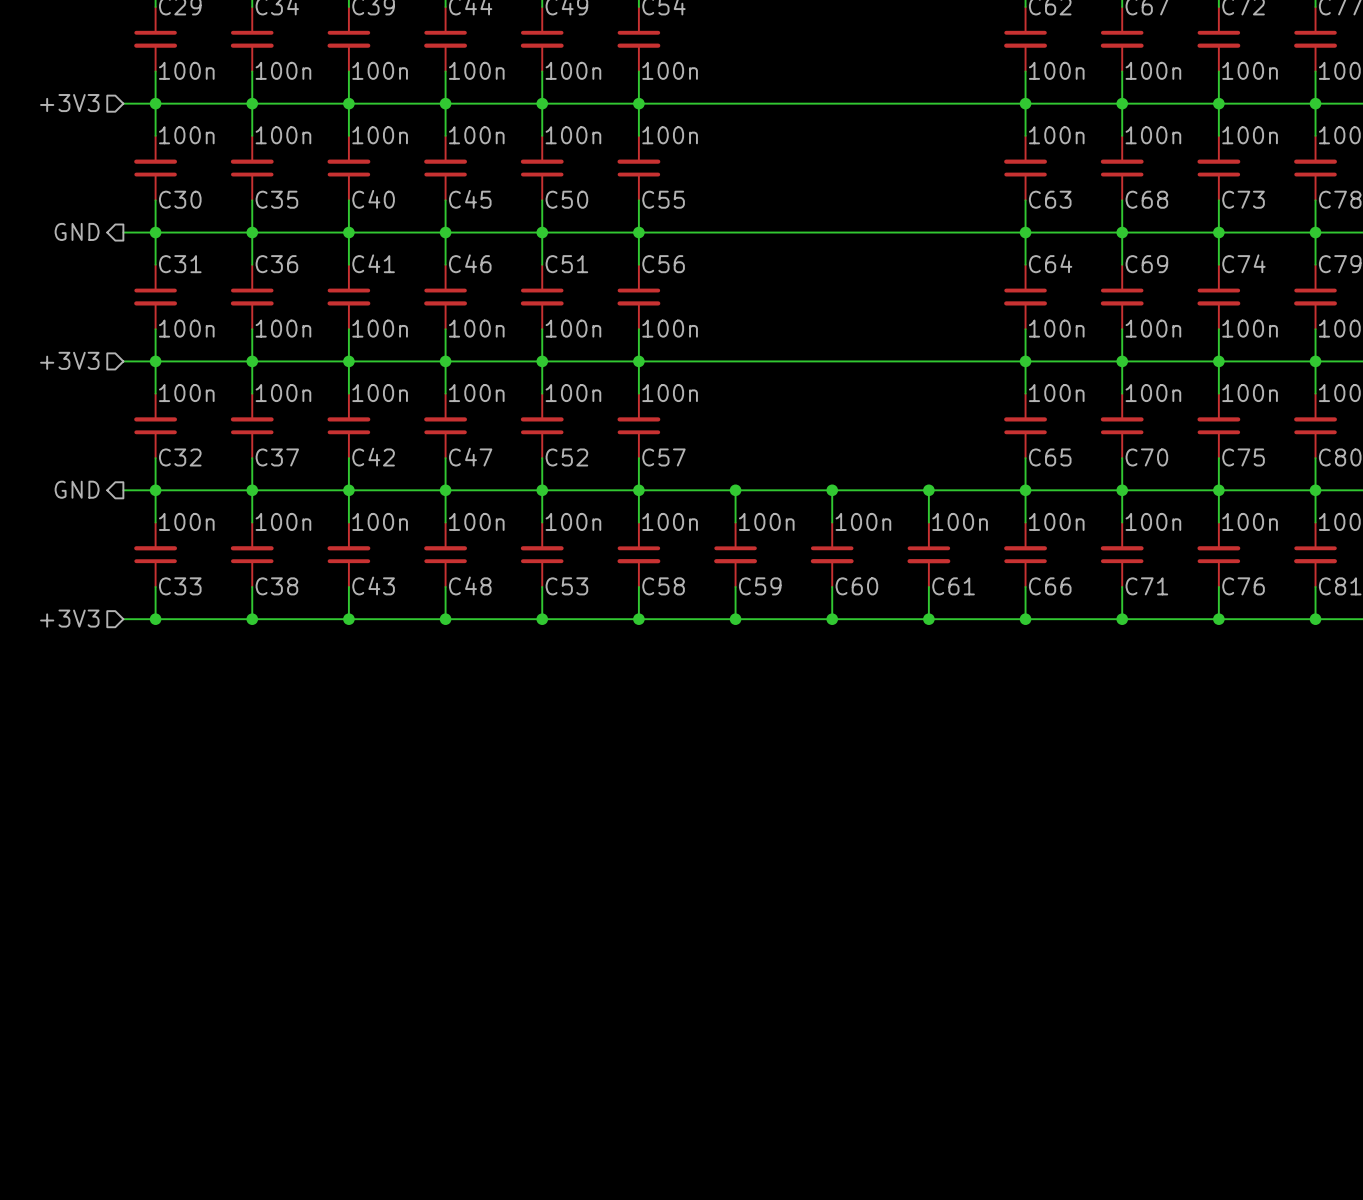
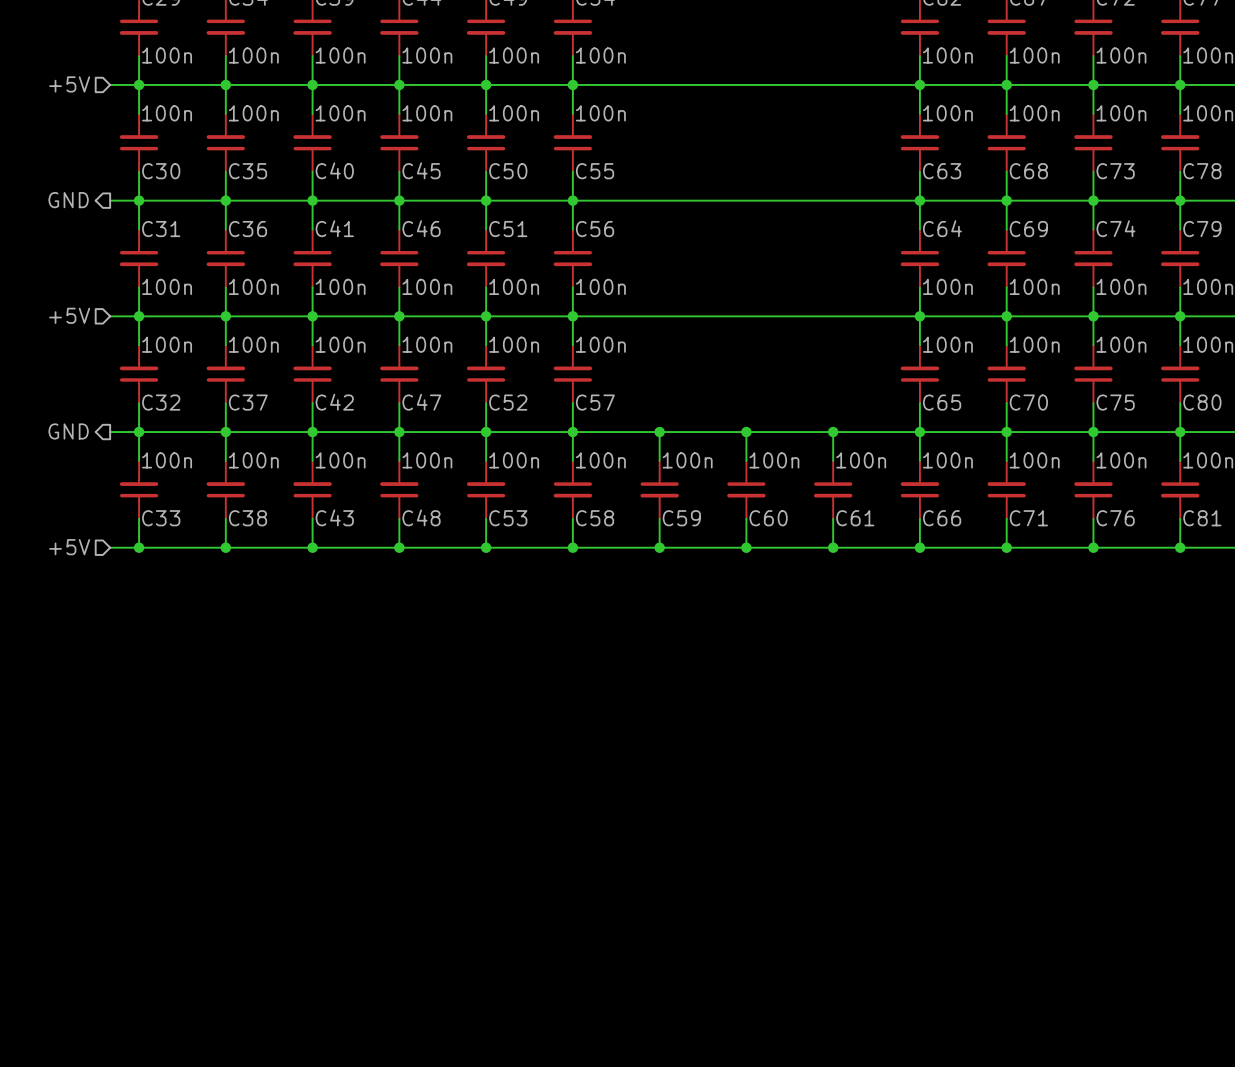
hierarchical label: +3V3 (69, 103) -> +5V (69, 84)
hierarchical label: +3V3 (69, 360) -> +5V (69, 315)
hierarchical label: +3V3 (69, 618) -> +5V (69, 547)

